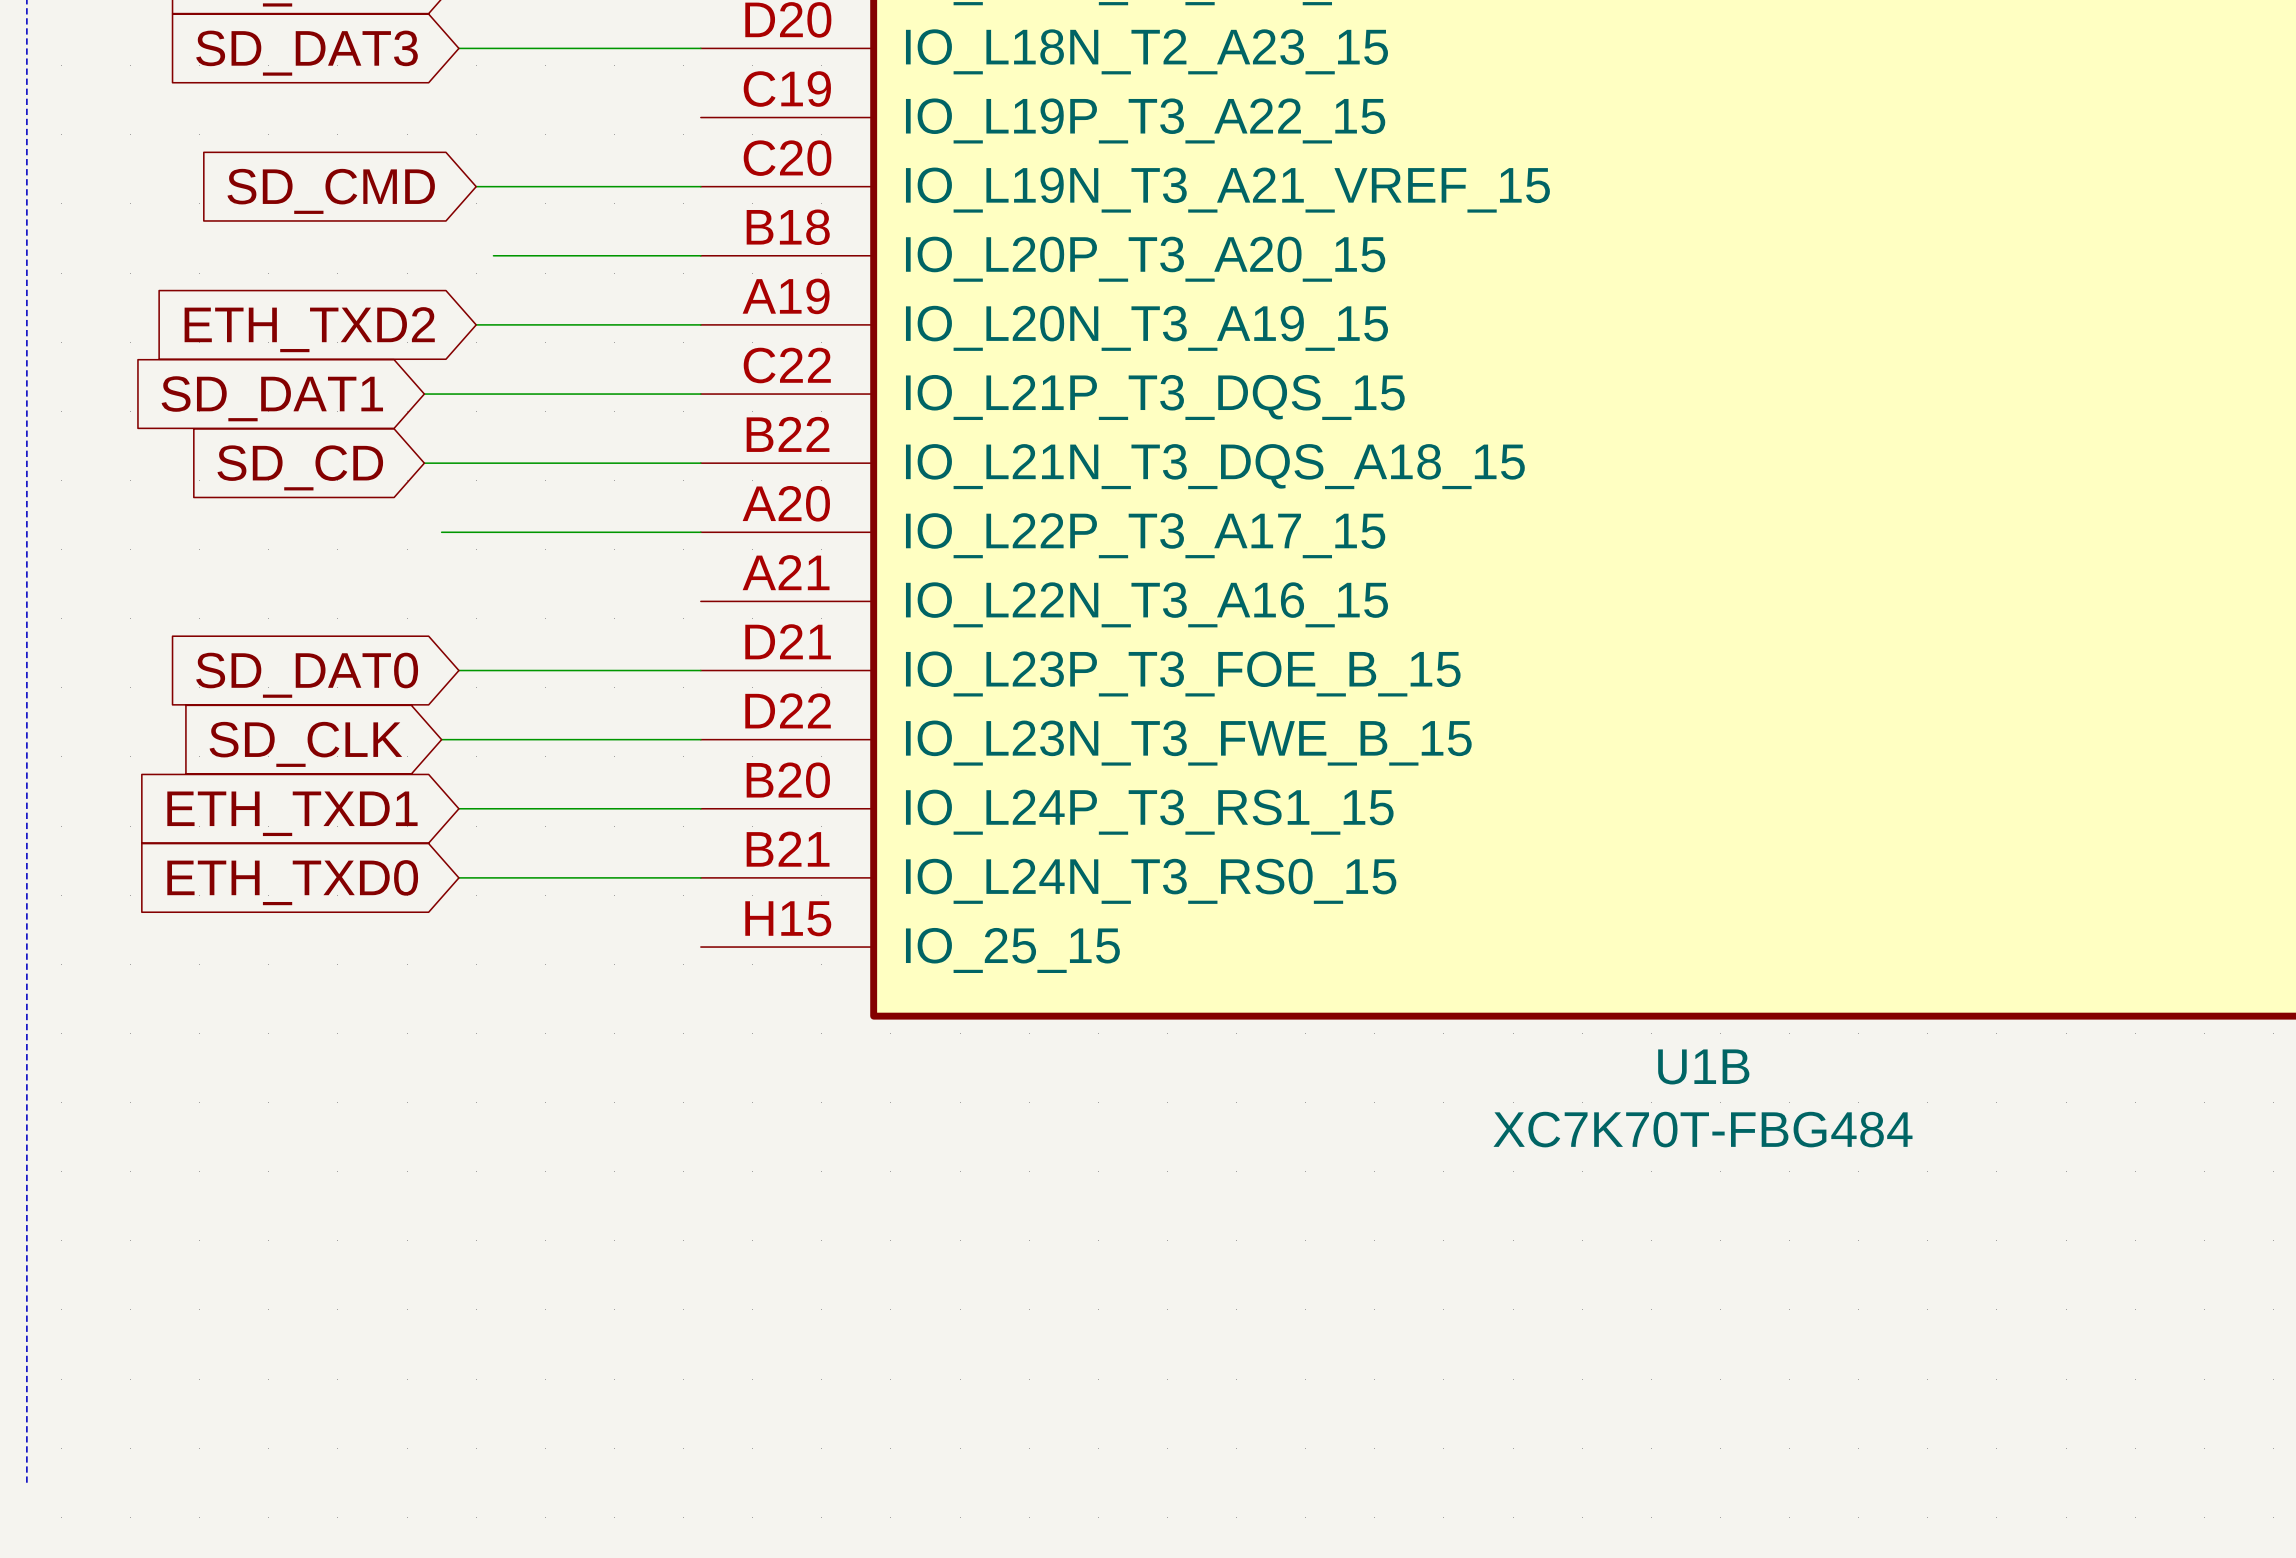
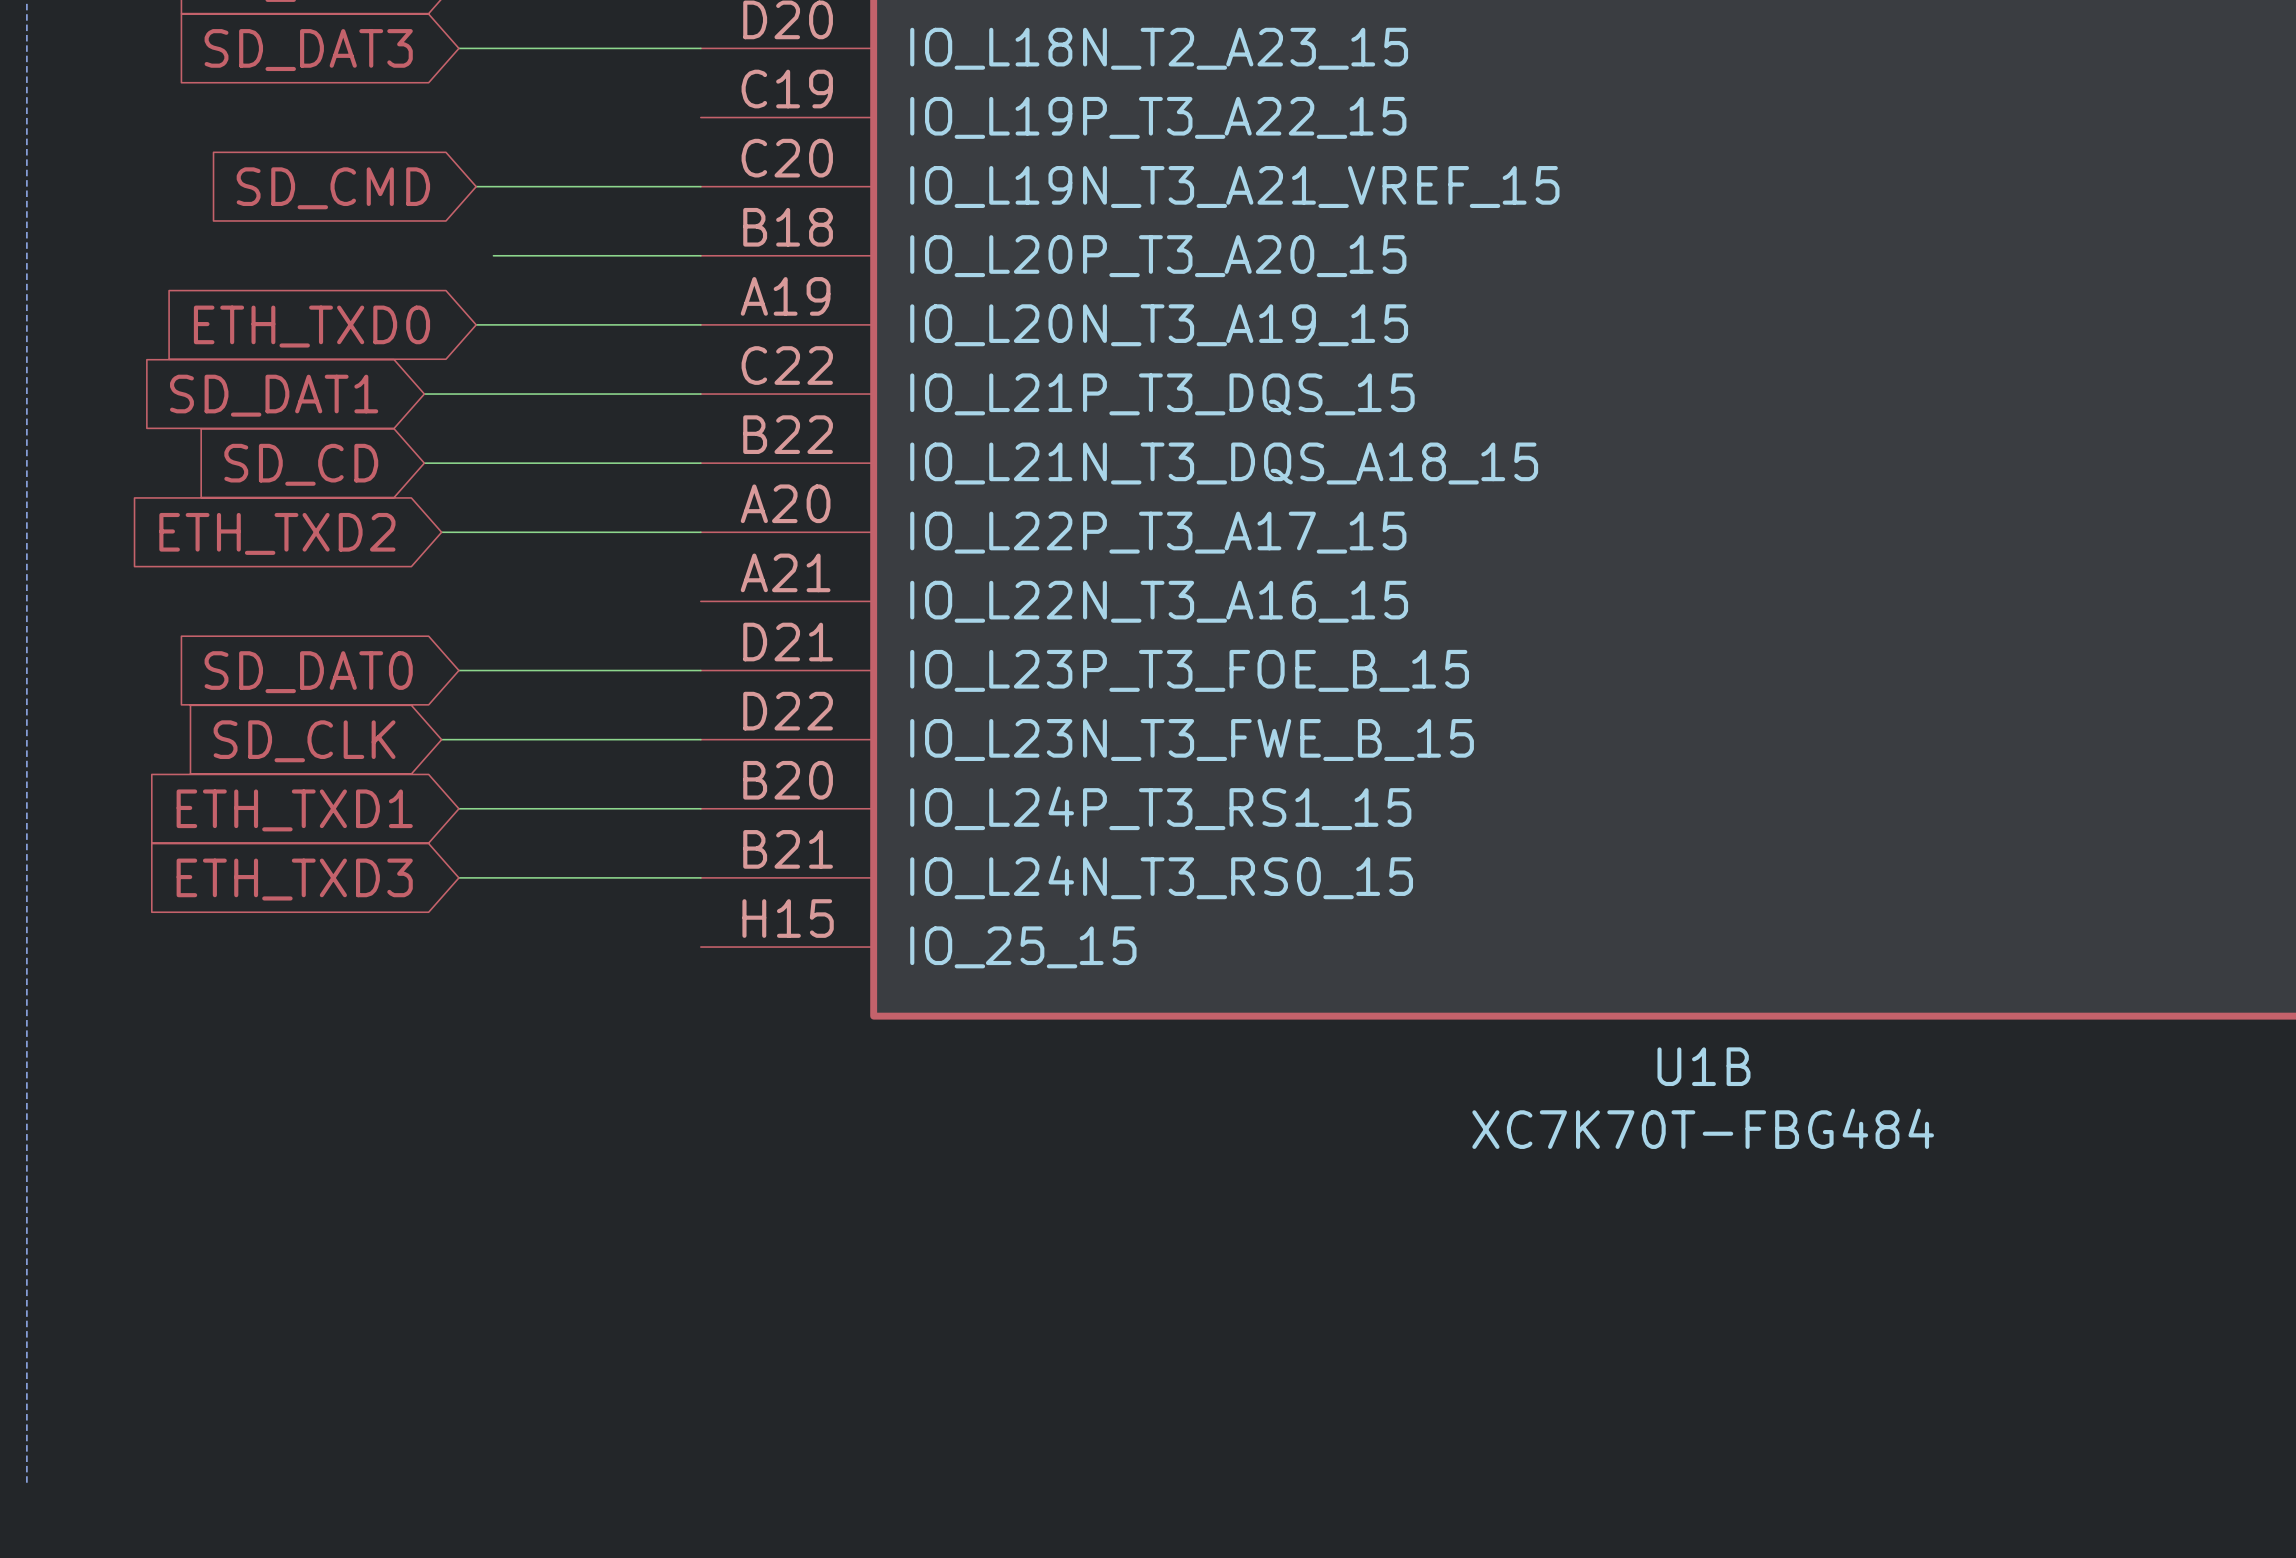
global label: ETH_TXD2 (309, 329) -> ETH_TXD0 (311, 326)
global label: none -> ETH_TXD2 (277, 533)
global label: ETH_TXD0 (292, 882) -> ETH_TXD3 (294, 879)

